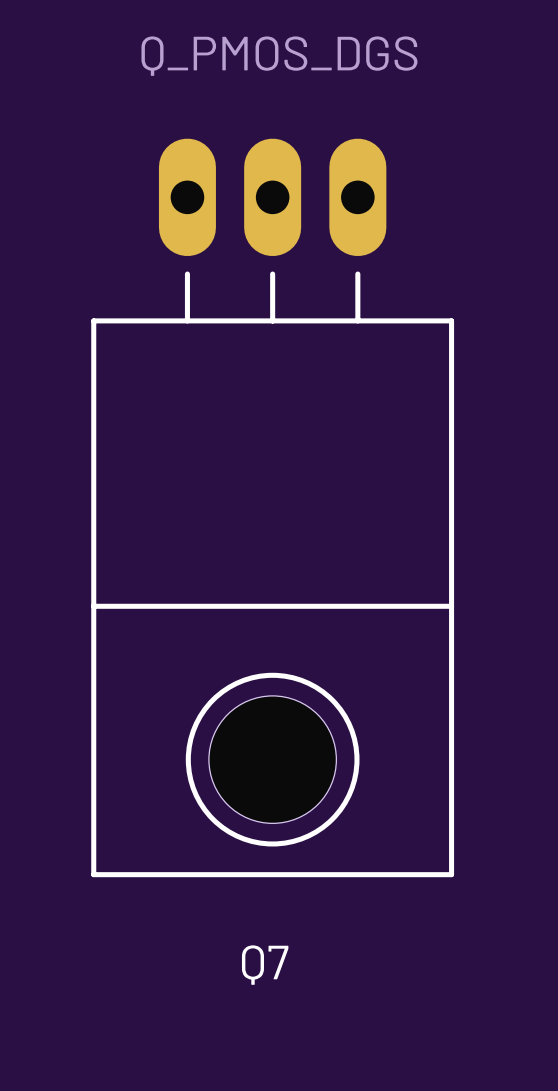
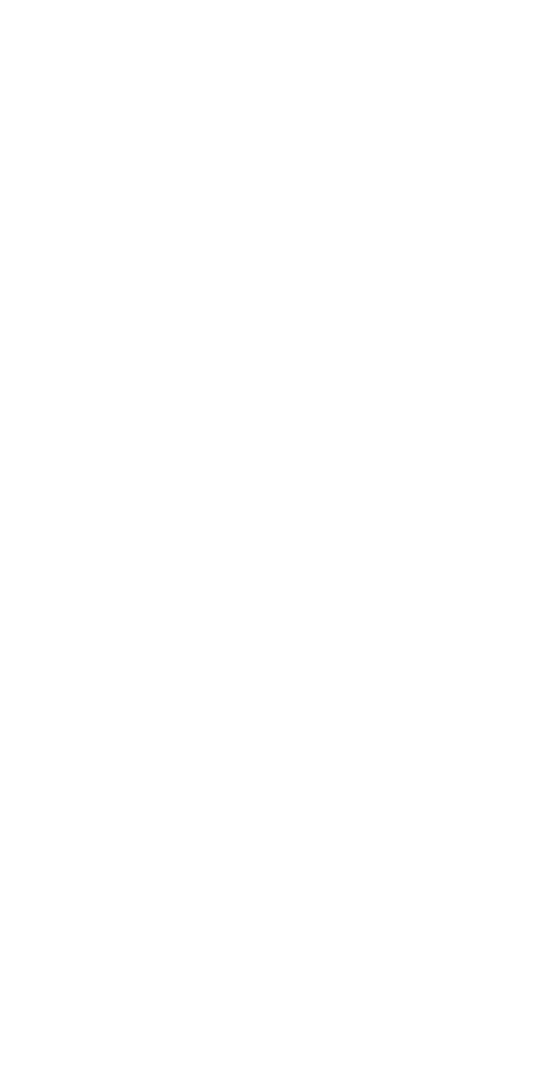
Q7: Q_PMOS_DGS (272, 507) -> none

